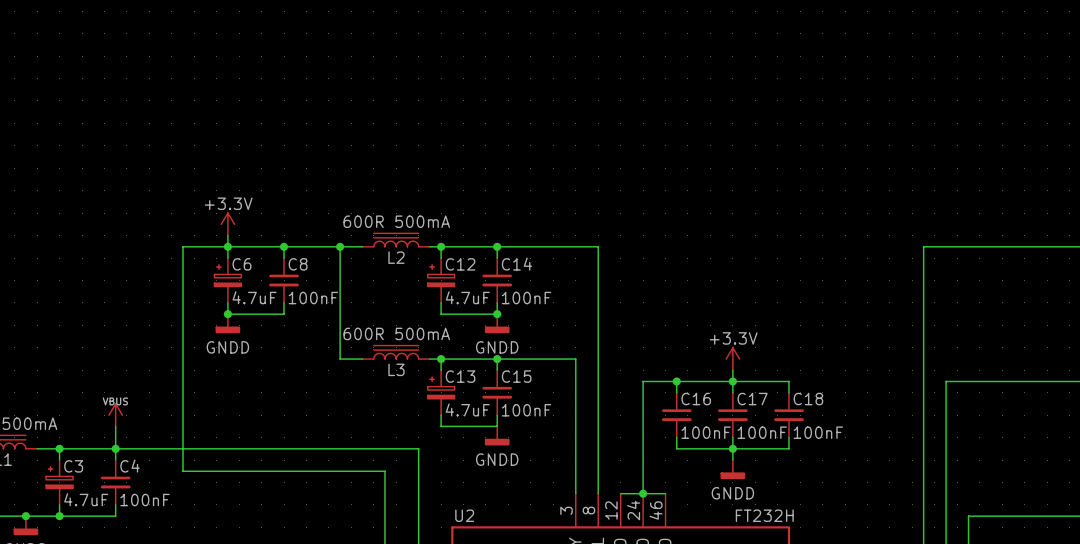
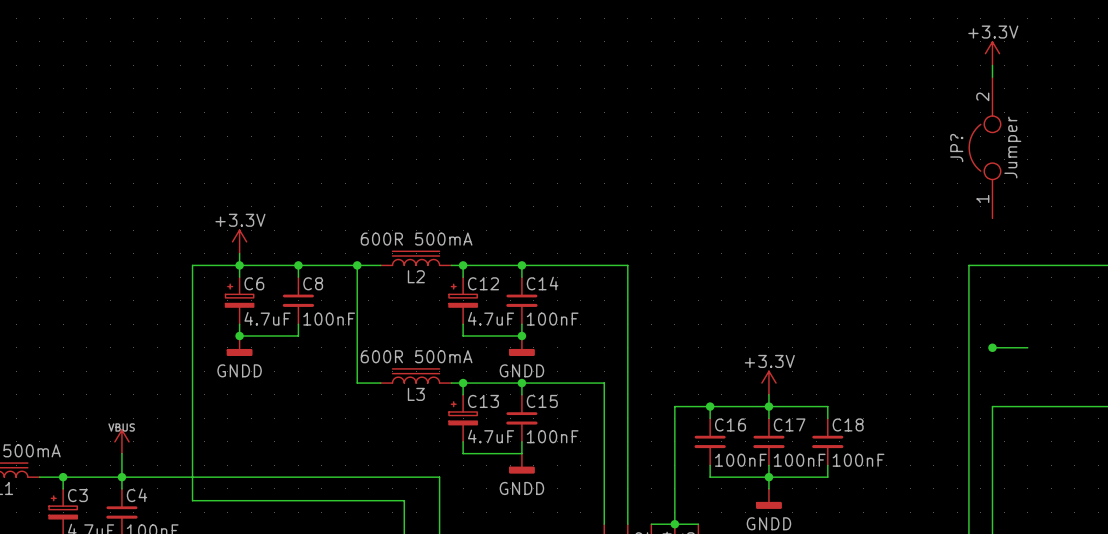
power symbol: none -> +3.3V (992, 53)
wire: none -> (992, 65) (992, 77)
JP?: none -> Jumper (984, 147)
wire: none -> (992, 347) (1027, 347)
junction: none -> (992, 347)

